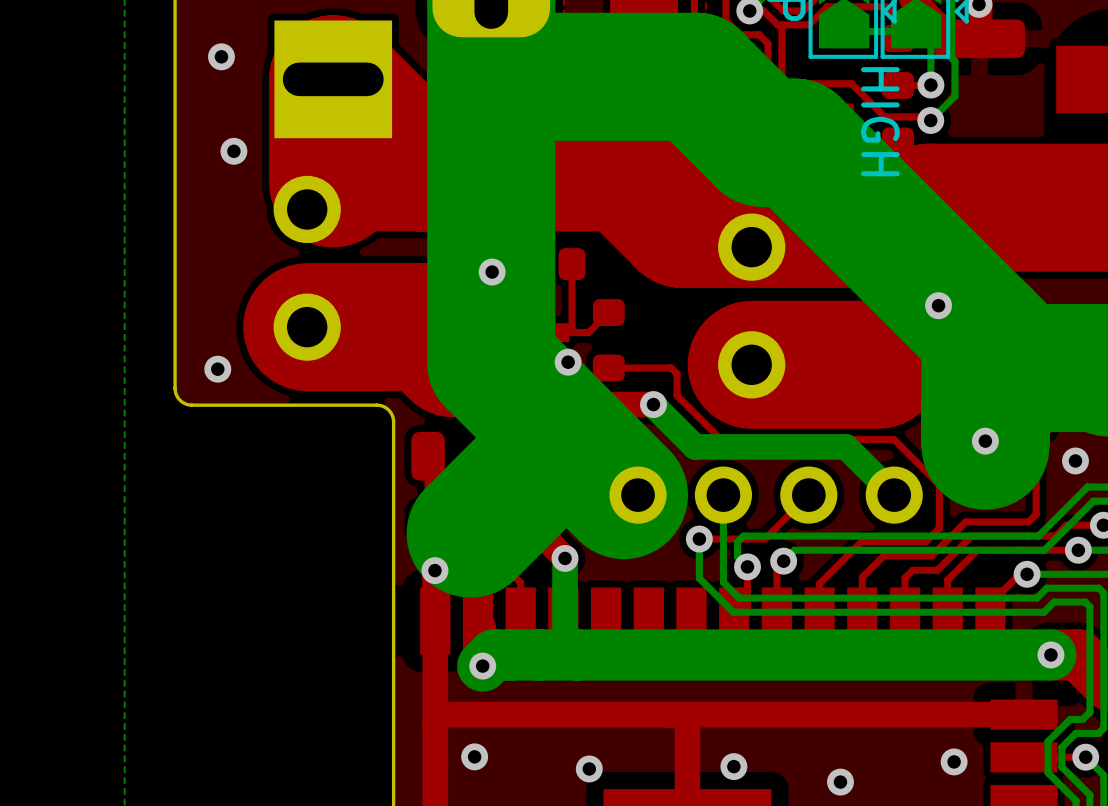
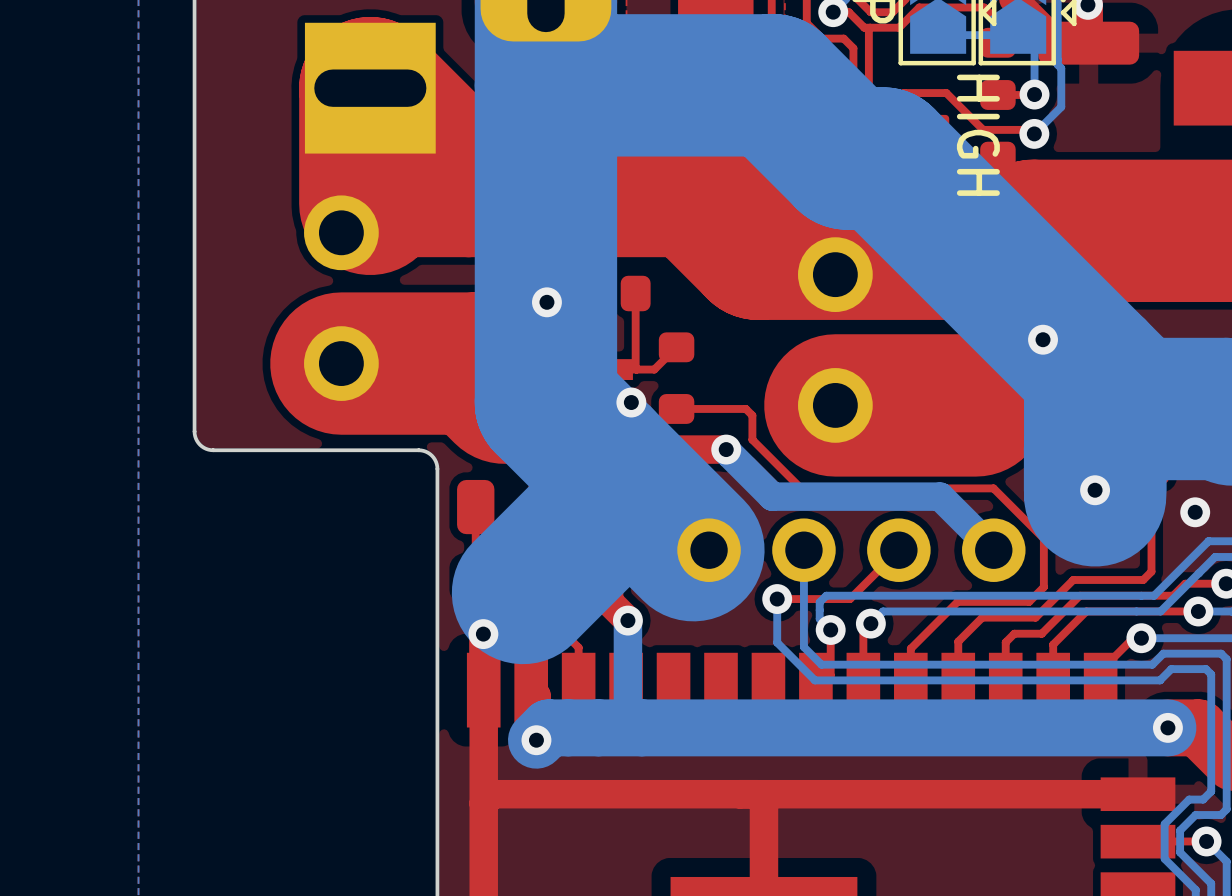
via: (221, 56) -> none
via: (233, 151) -> none
via: (217, 369) -> none
via: (474, 756) -> none
via: (954, 761) -> none
via: (733, 766) -> none
via: (589, 768) -> none
via: (840, 782) -> none

